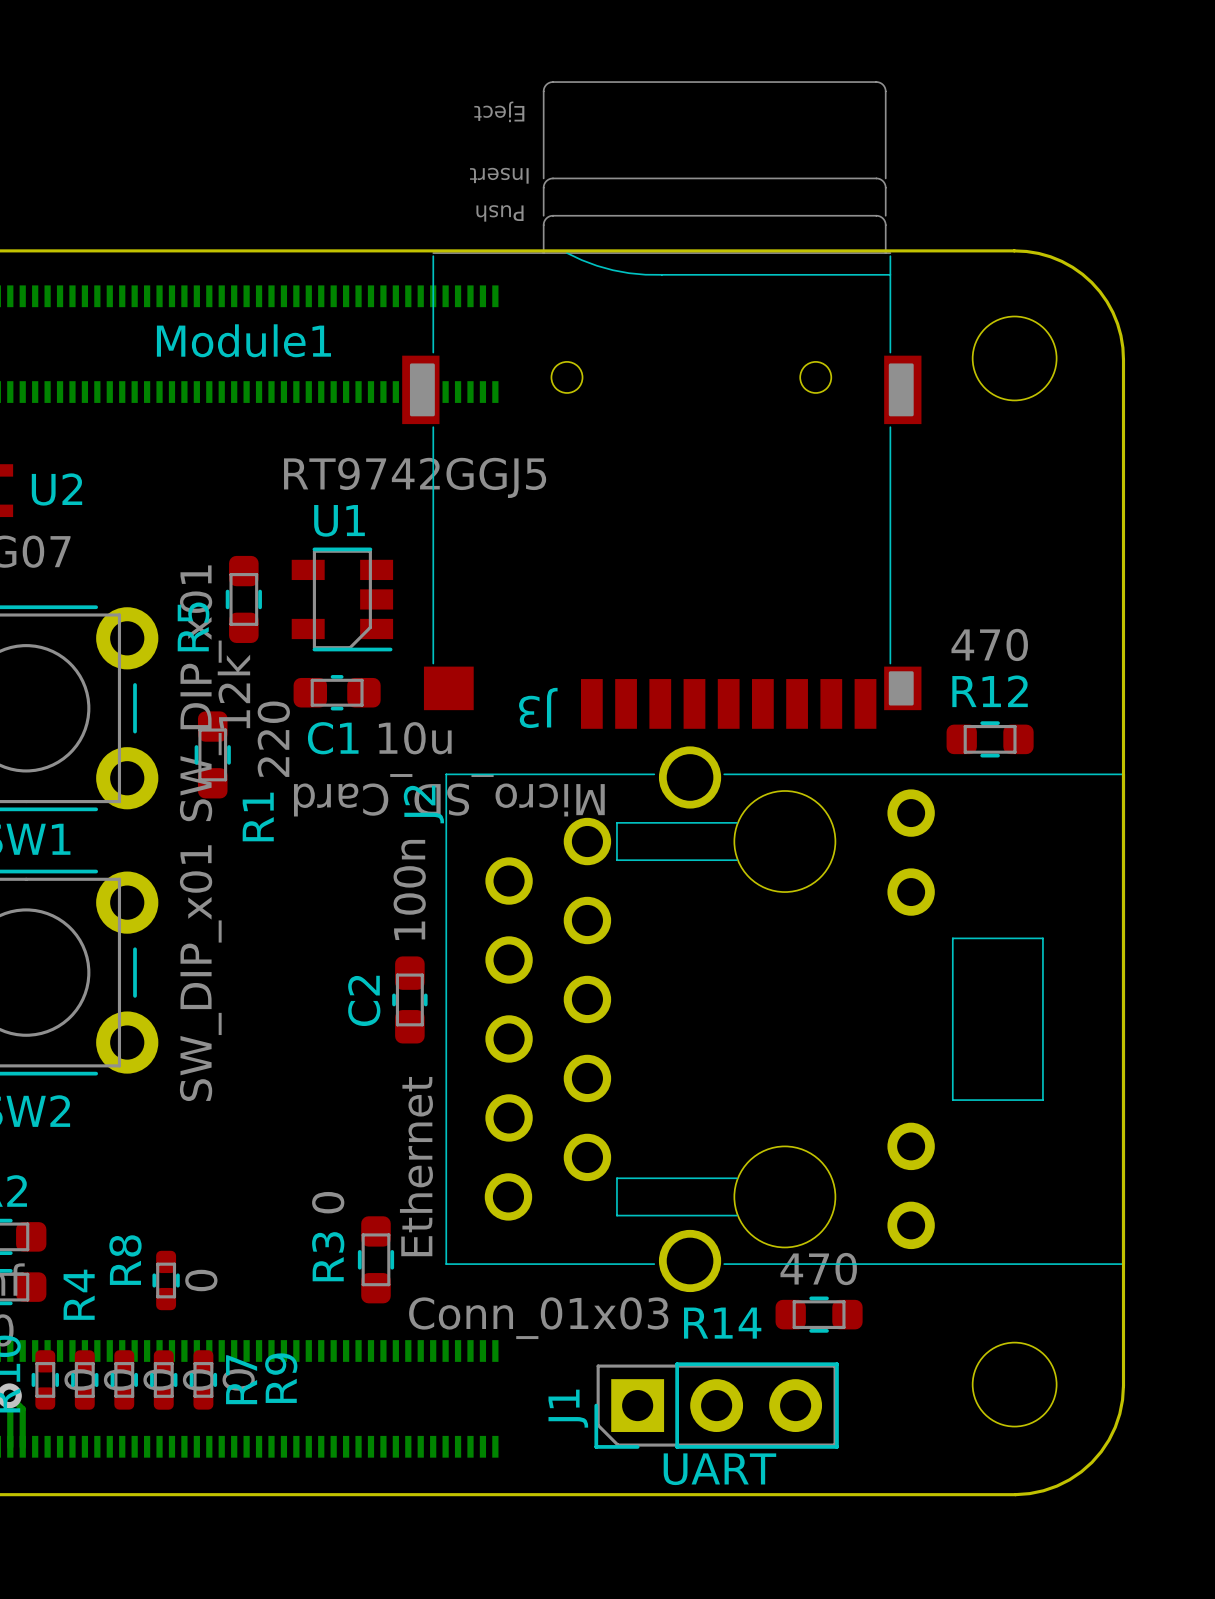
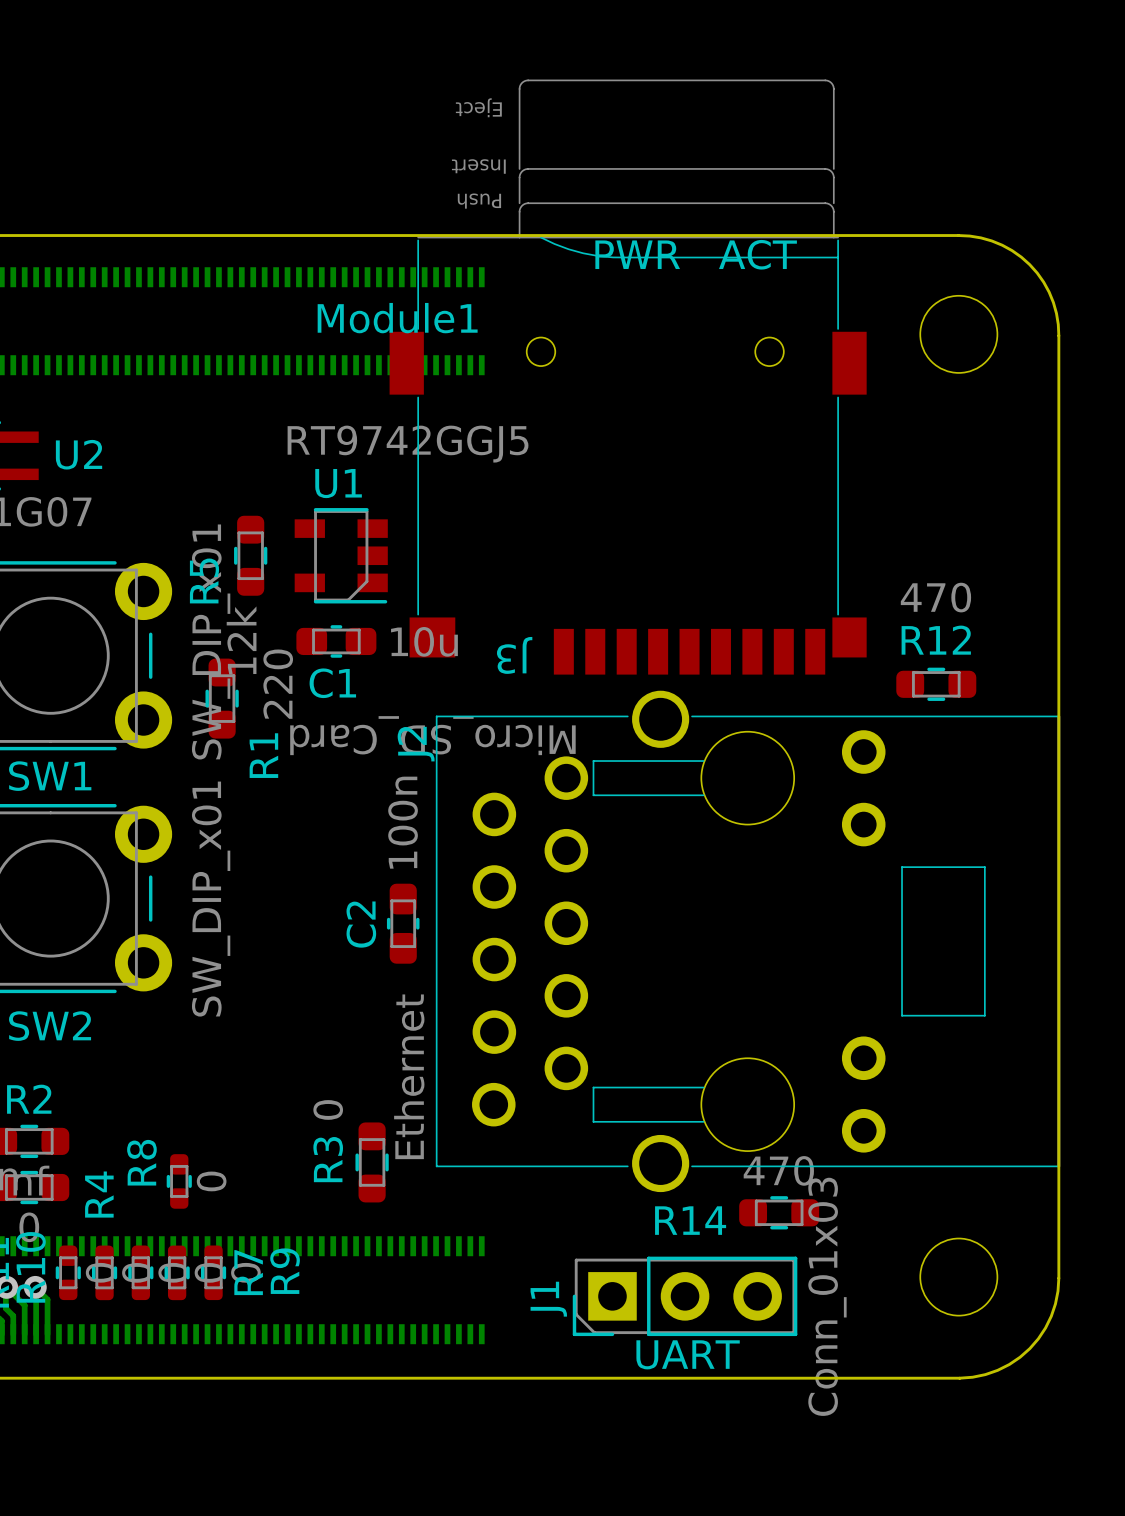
J3 footprint: [402, 81, 922, 729] -> [389, 79, 867, 675]
text: none -> PWR (637, 254)
text: none -> ACT (757, 254)
Module1 name position: Module1 (243, 340) -> Module1 (397, 318)
C1 value position: 10u (415, 738) -> 10u (424, 641)
J1 value rotation: 0° (538, 1318) -> 90° counterclockwise (827, 1296)
J1 value position: Conn_01x03 (538, 1318) -> Conn_01x03 (827, 1296)

